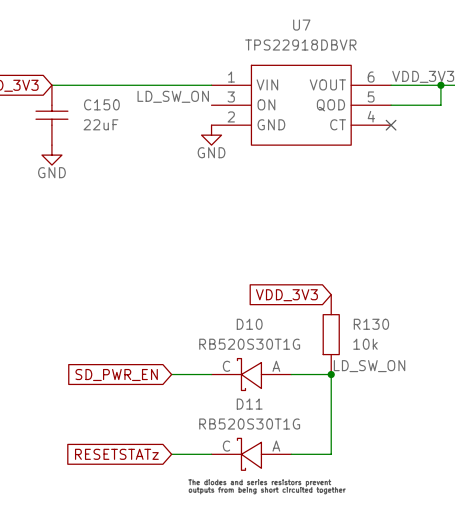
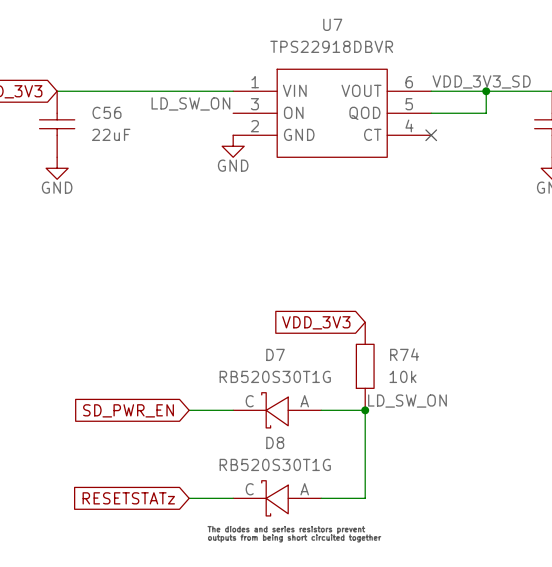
C150 name: C150 (101, 104) -> C56 (107, 112)
D10 name: D10 (249, 324) -> D7 (275, 354)
R130 name: R130 (371, 324) -> R74 (404, 354)
D11 name: D11 (249, 404) -> D8 (275, 442)

